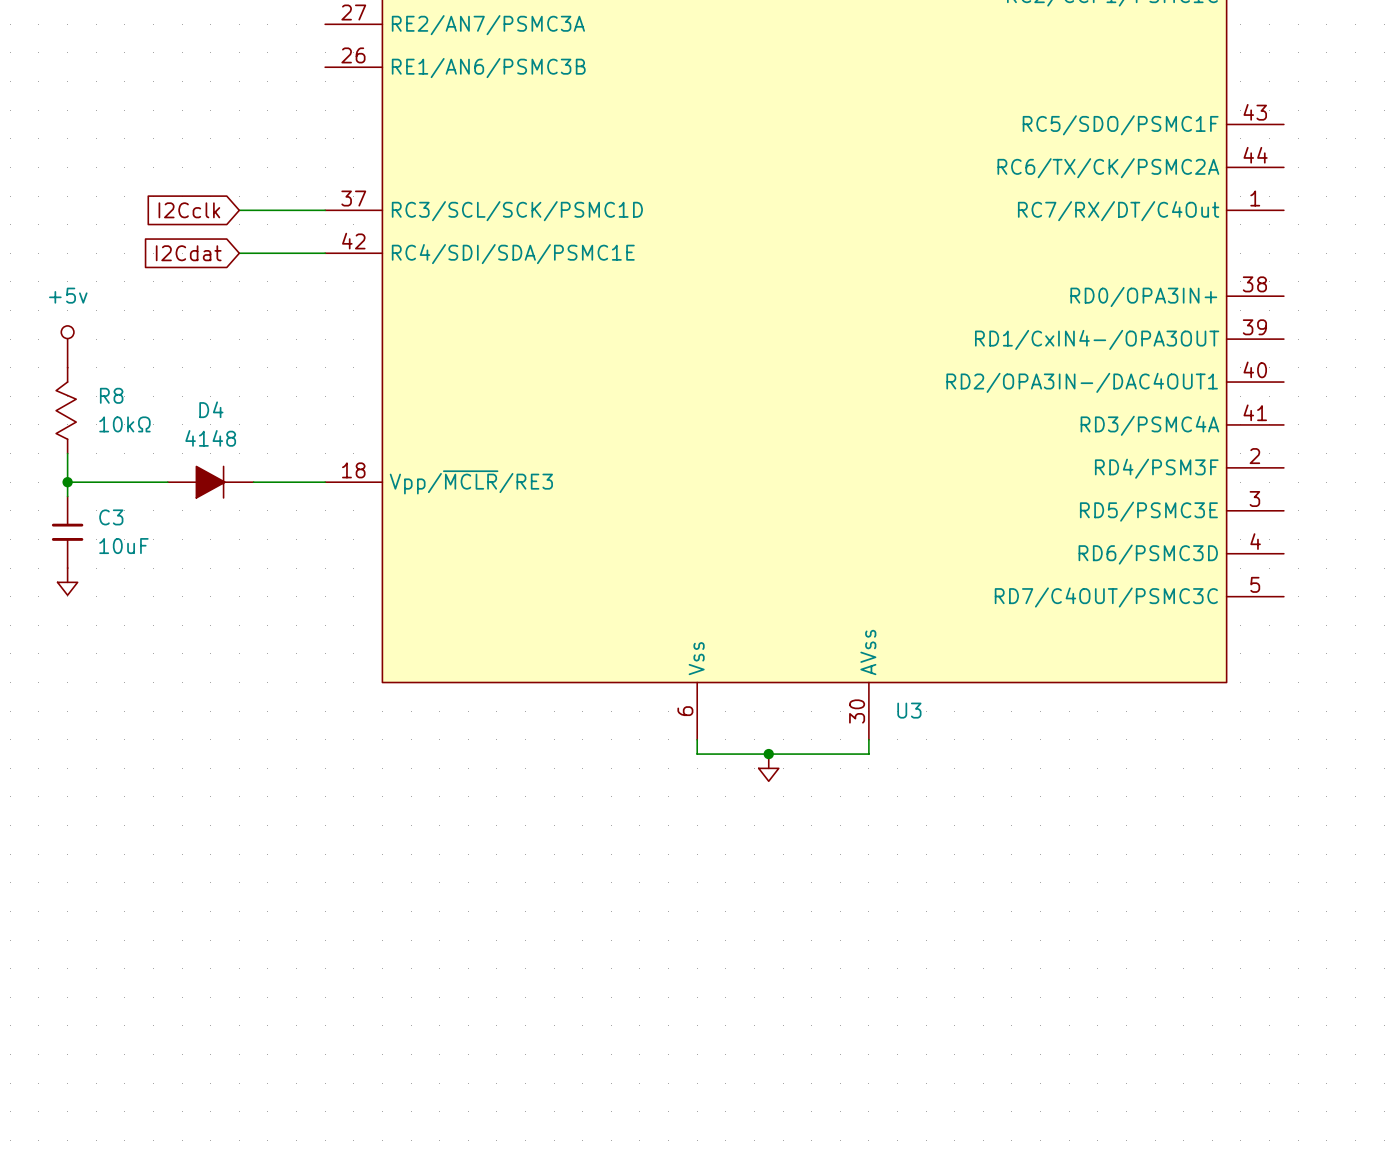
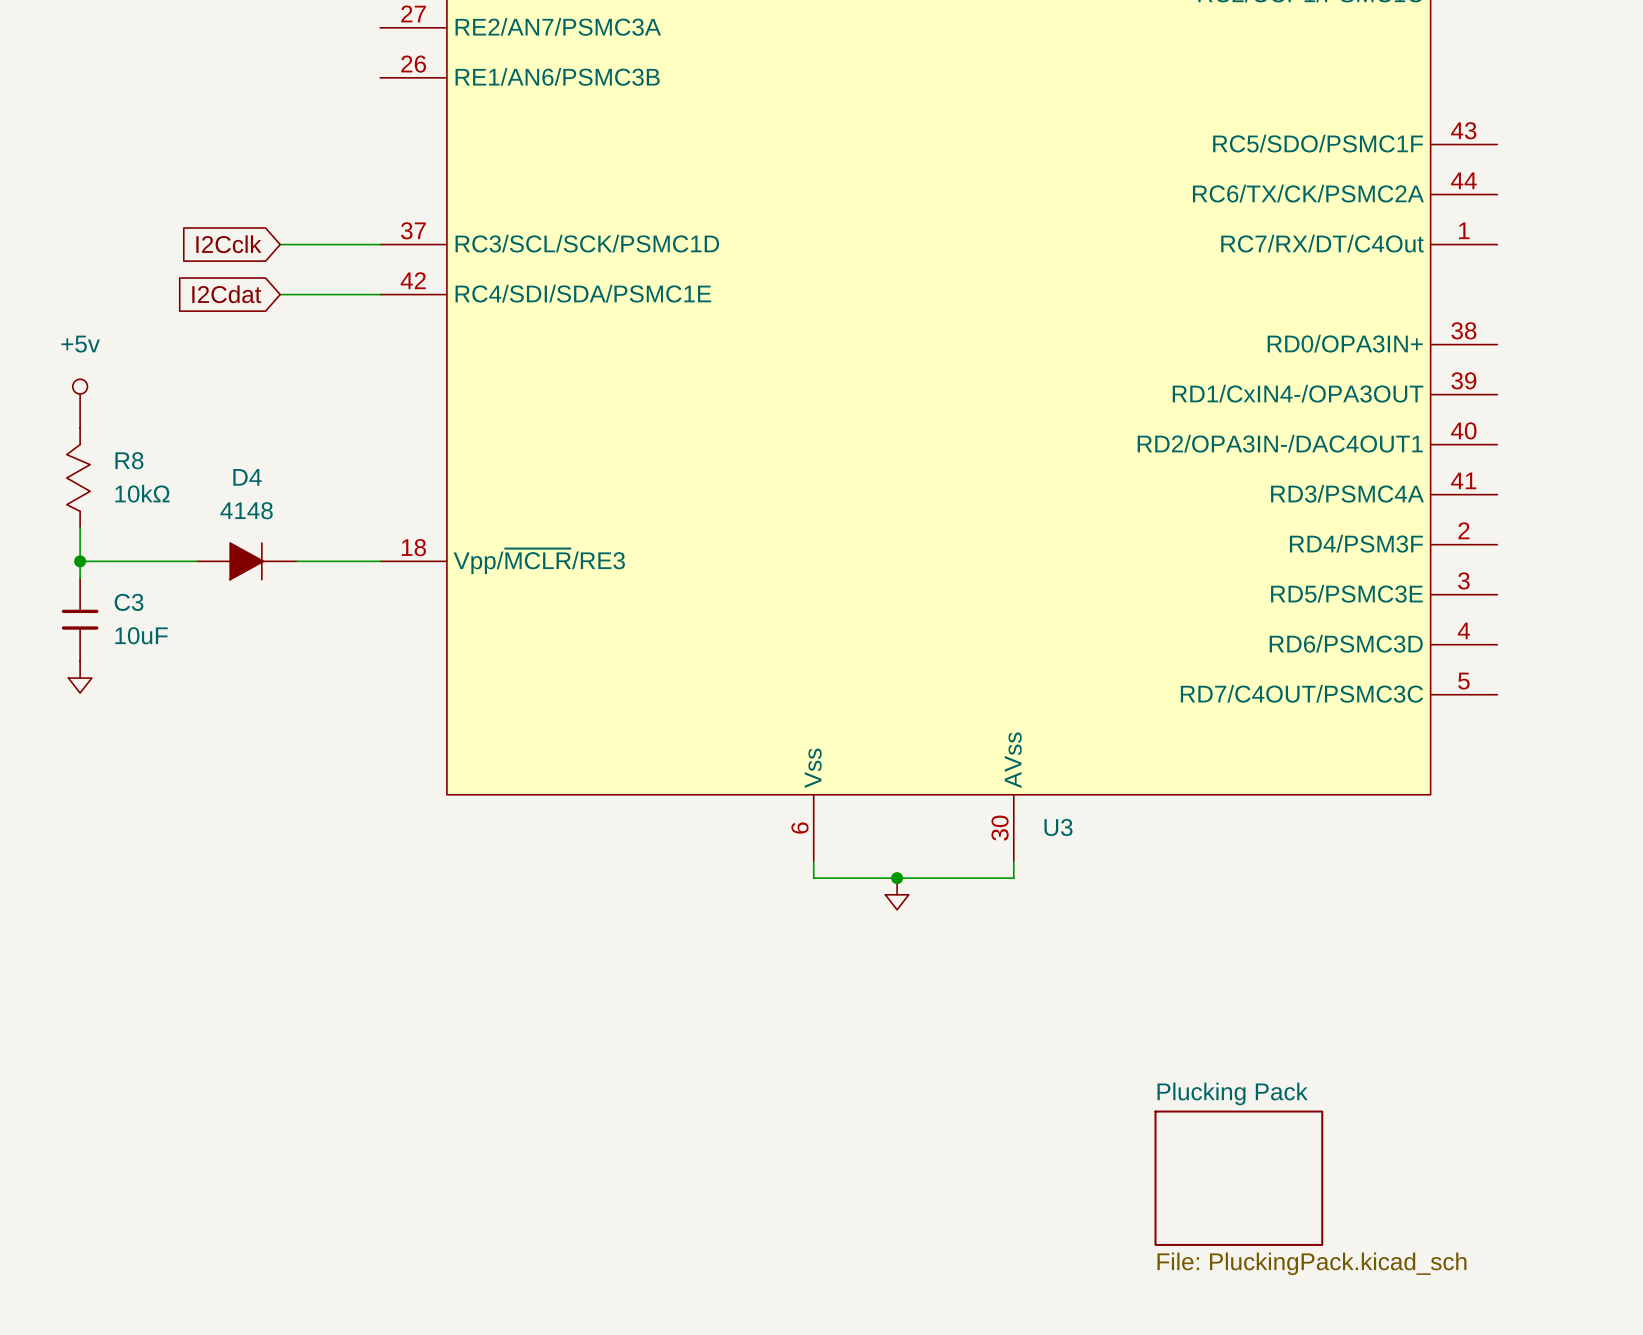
sheet Plucking Pack: none -> File: PluckingPack.kicad_sch (1238, 1178)

